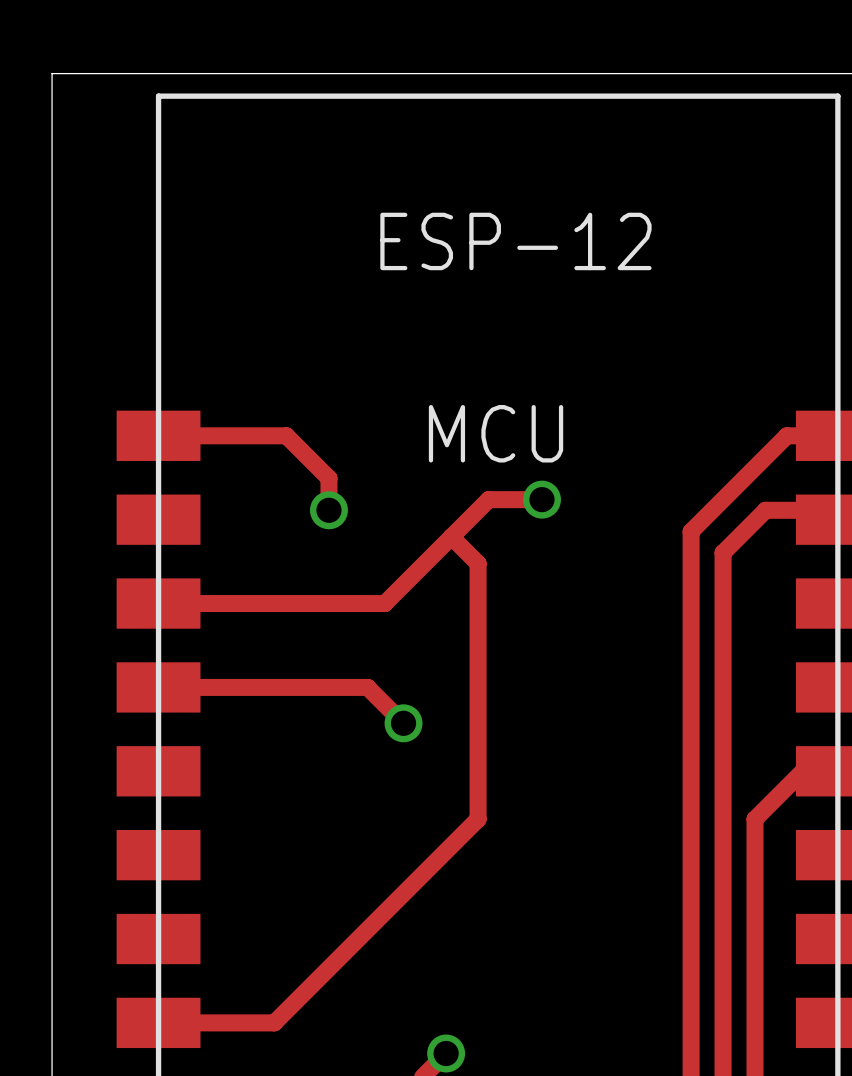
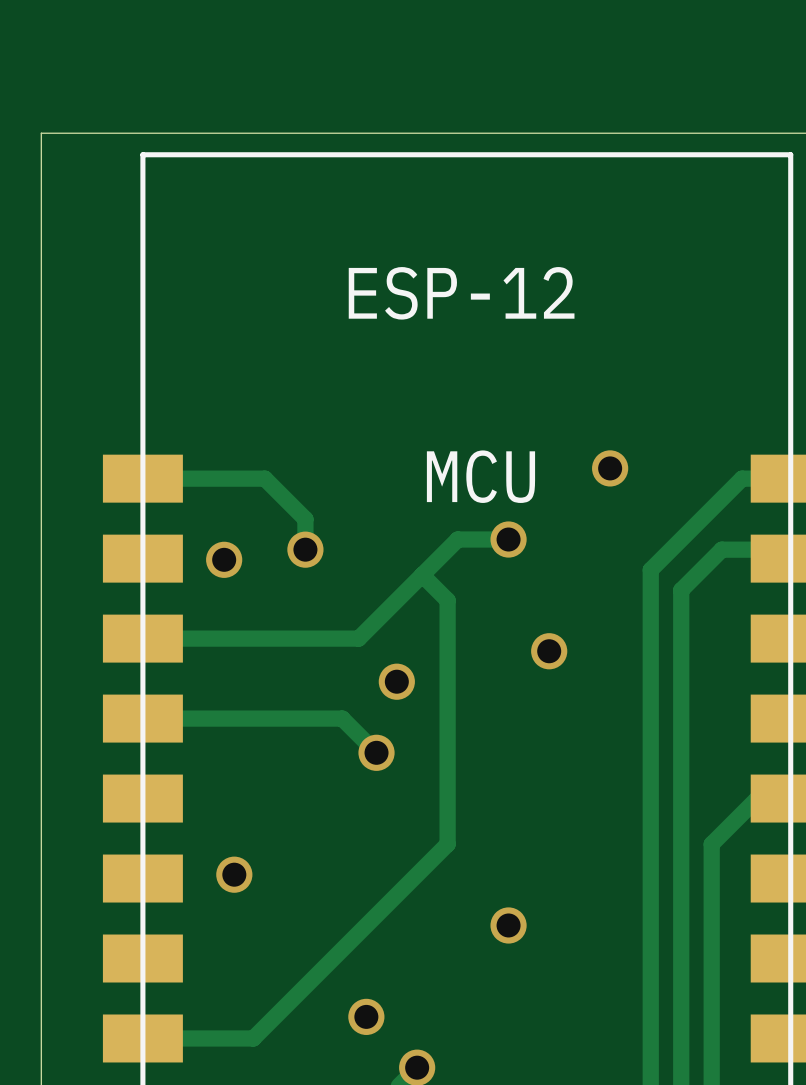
via: none -> (610, 468)
via: none -> (224, 559)
via: none -> (549, 651)
via: none -> (396, 681)
via: none -> (234, 874)
via: none -> (508, 925)
via: none -> (366, 1016)

